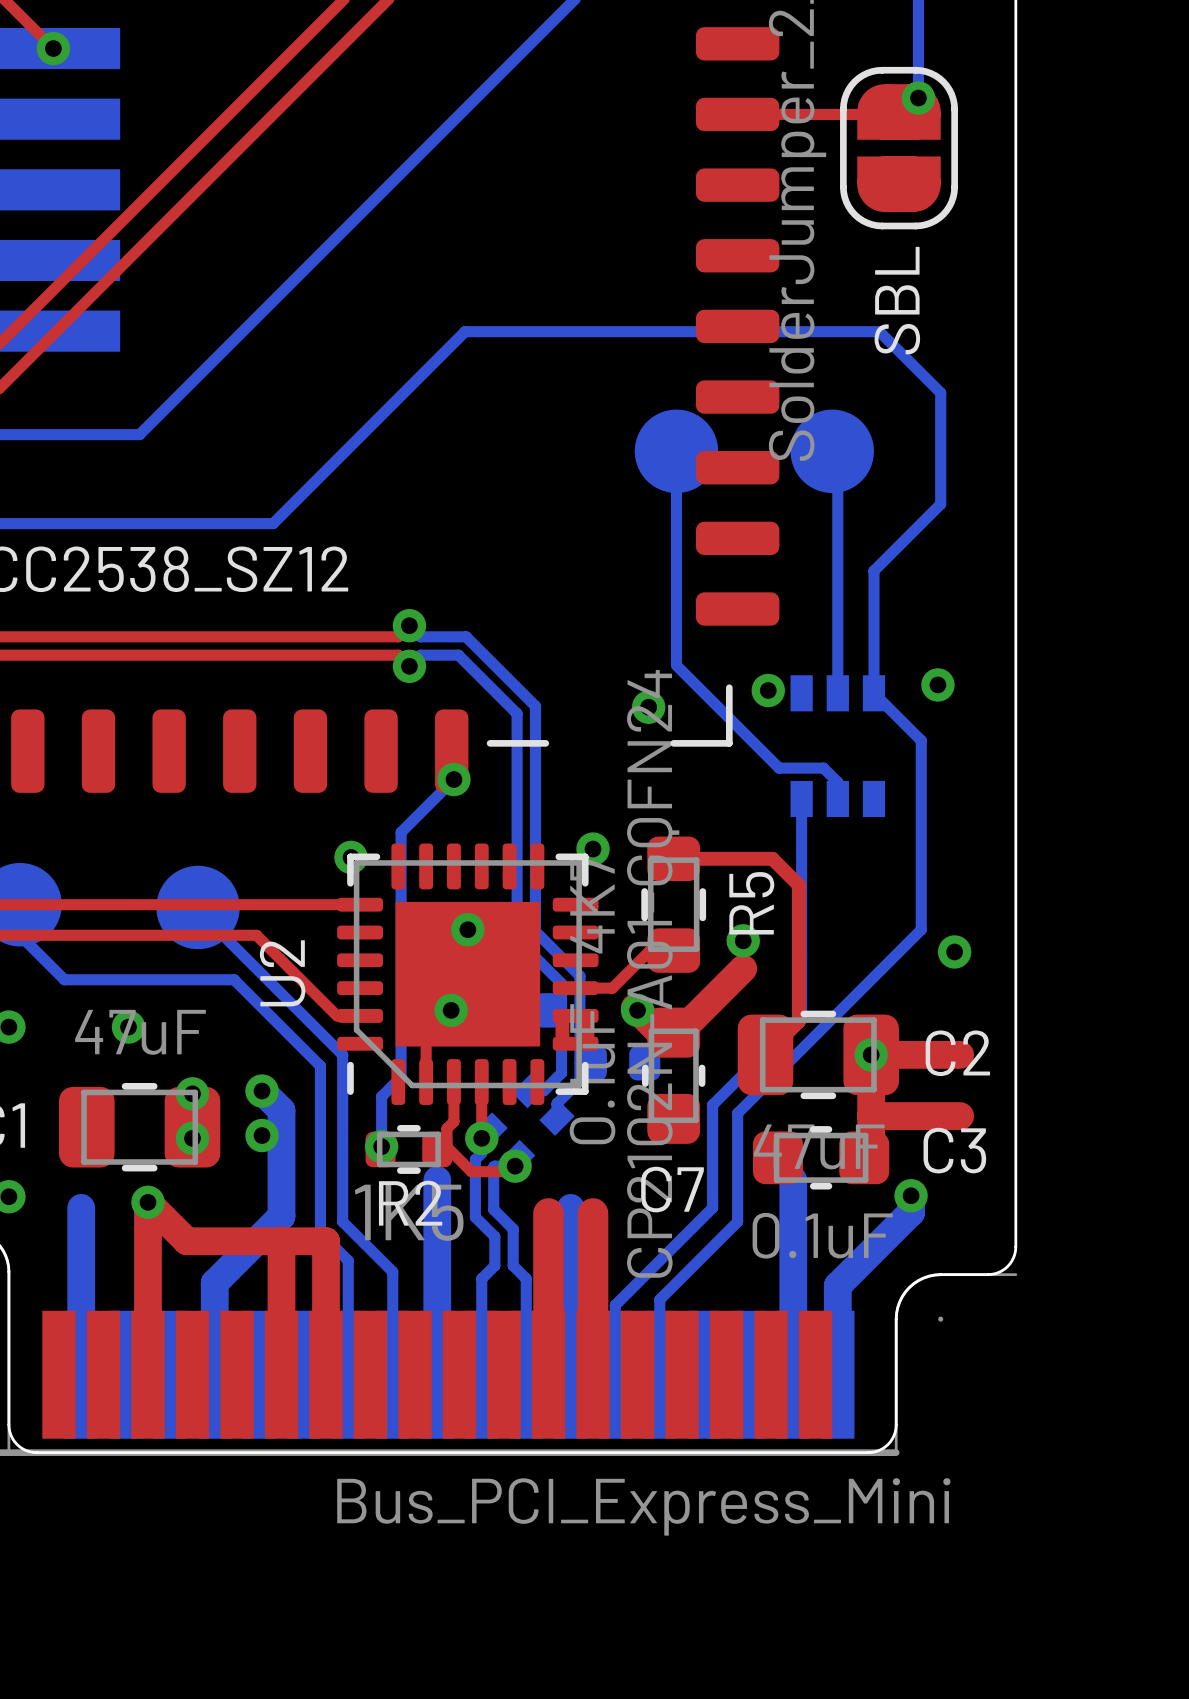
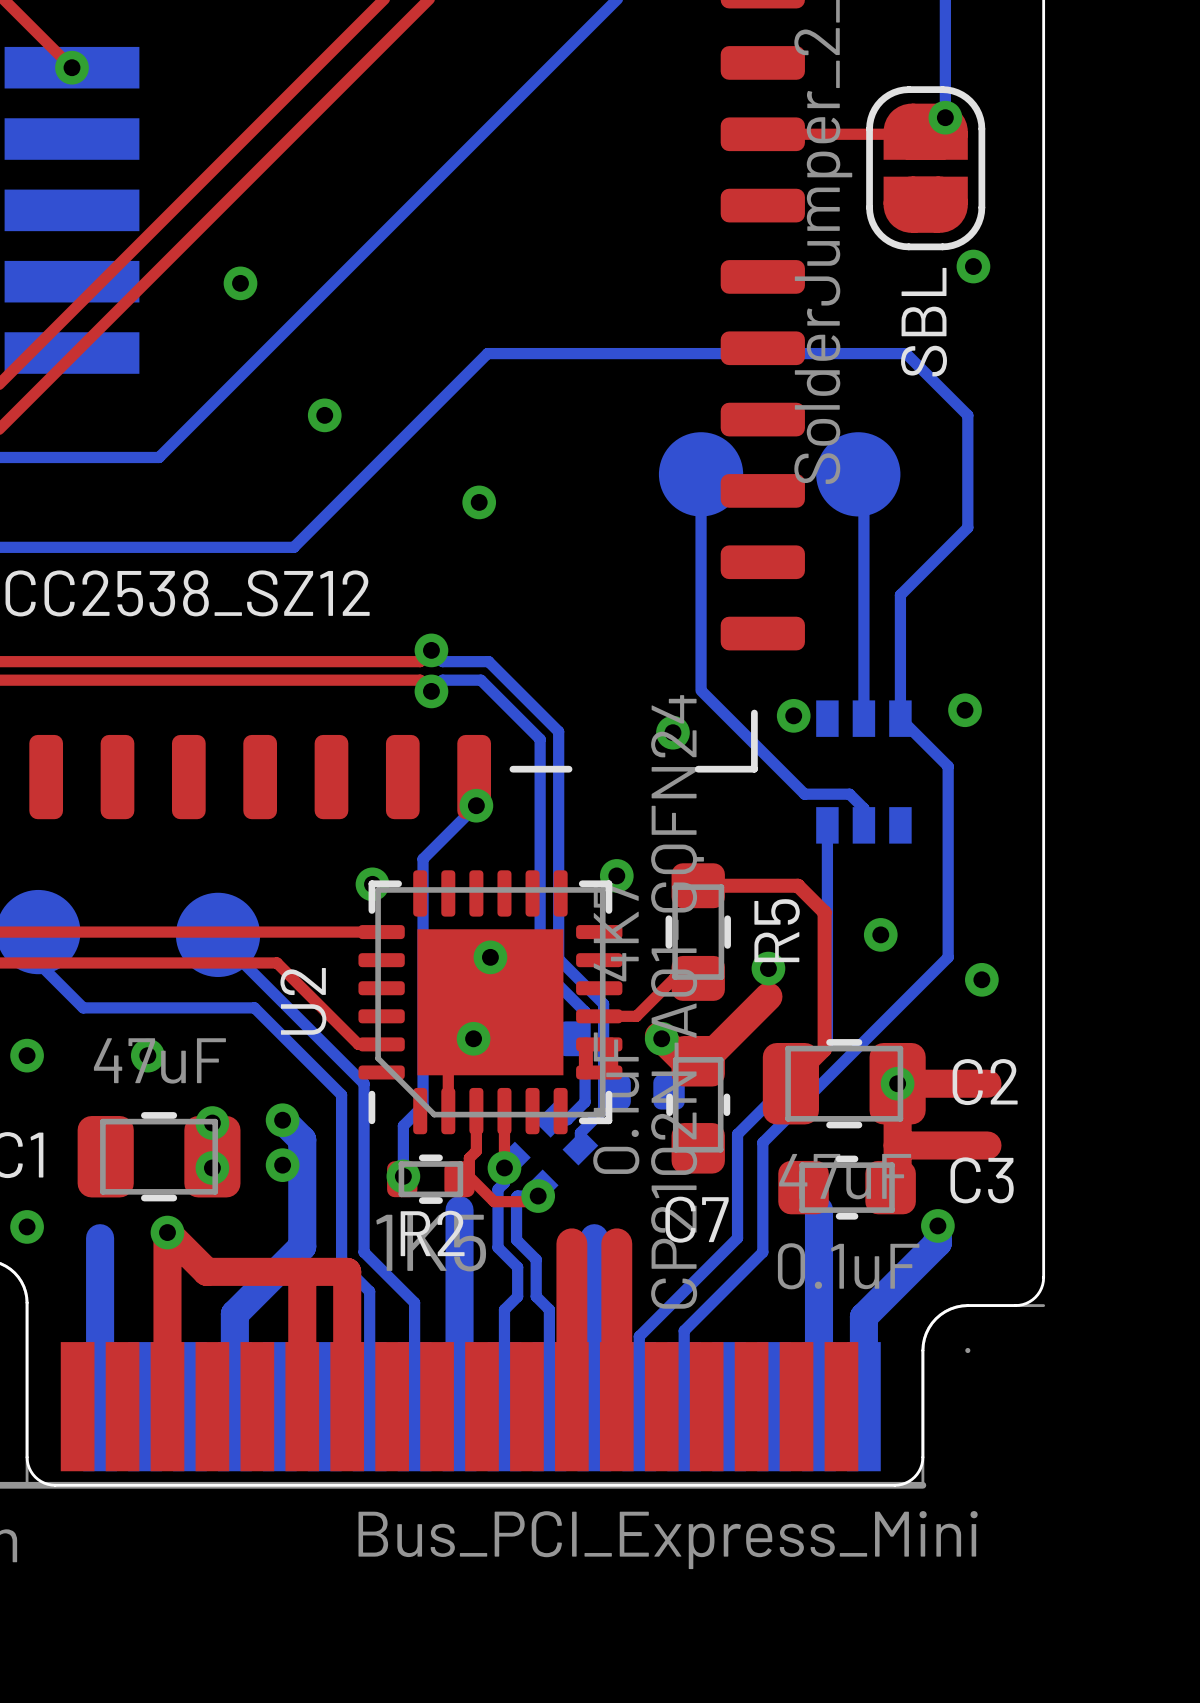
via: none -> (973, 266)
via: none -> (240, 283)
via: none -> (324, 415)
via: none -> (479, 502)
via: none -> (880, 934)

